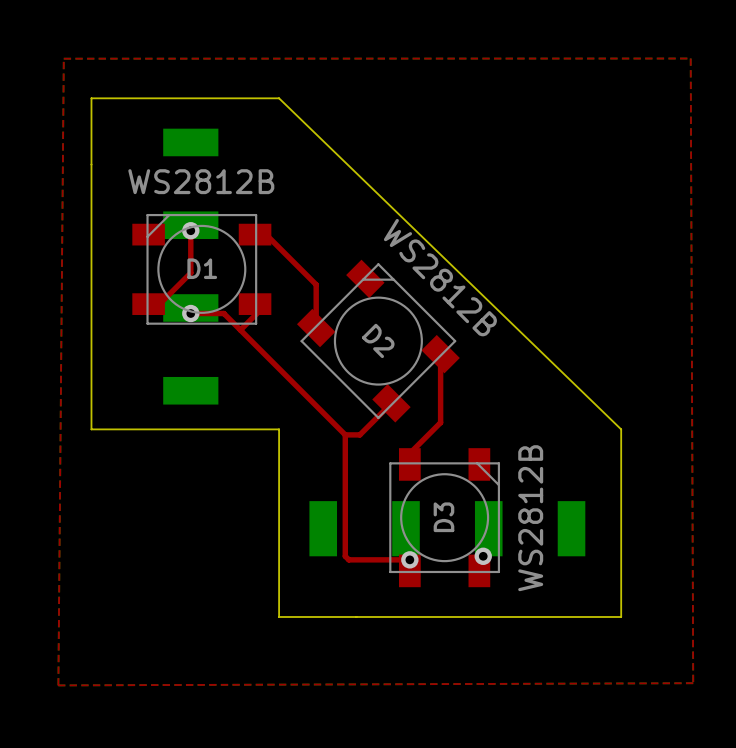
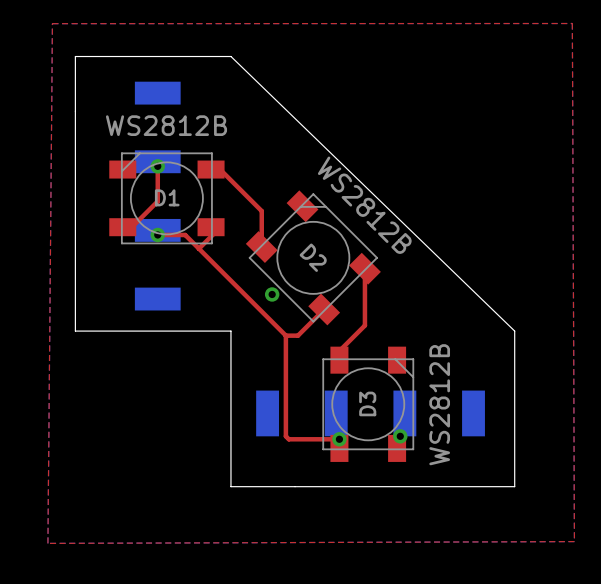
via: none -> (272, 294)

